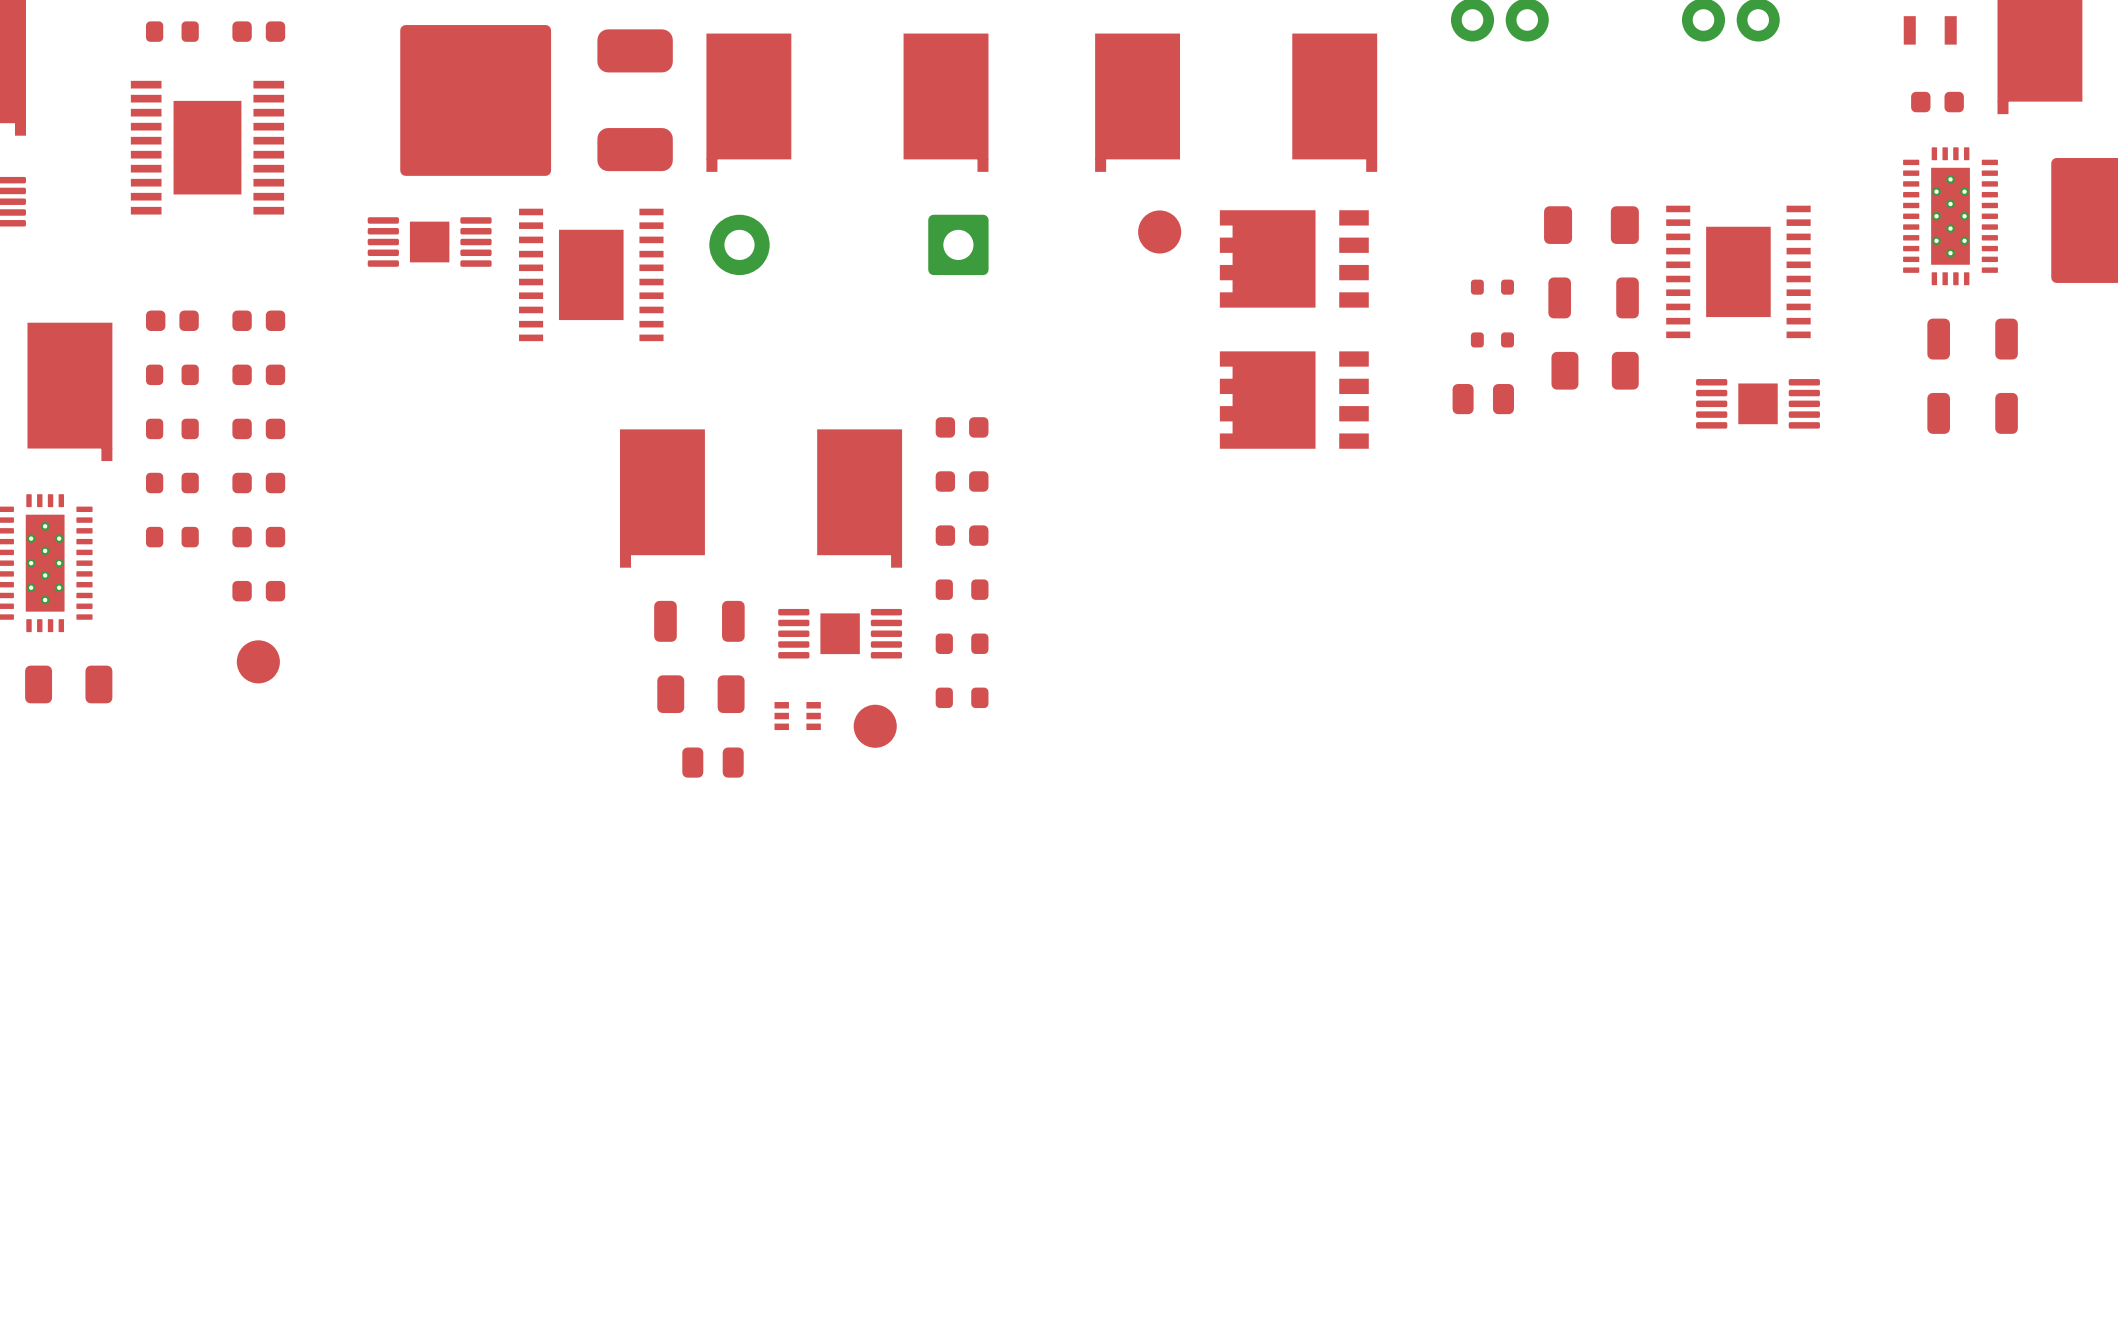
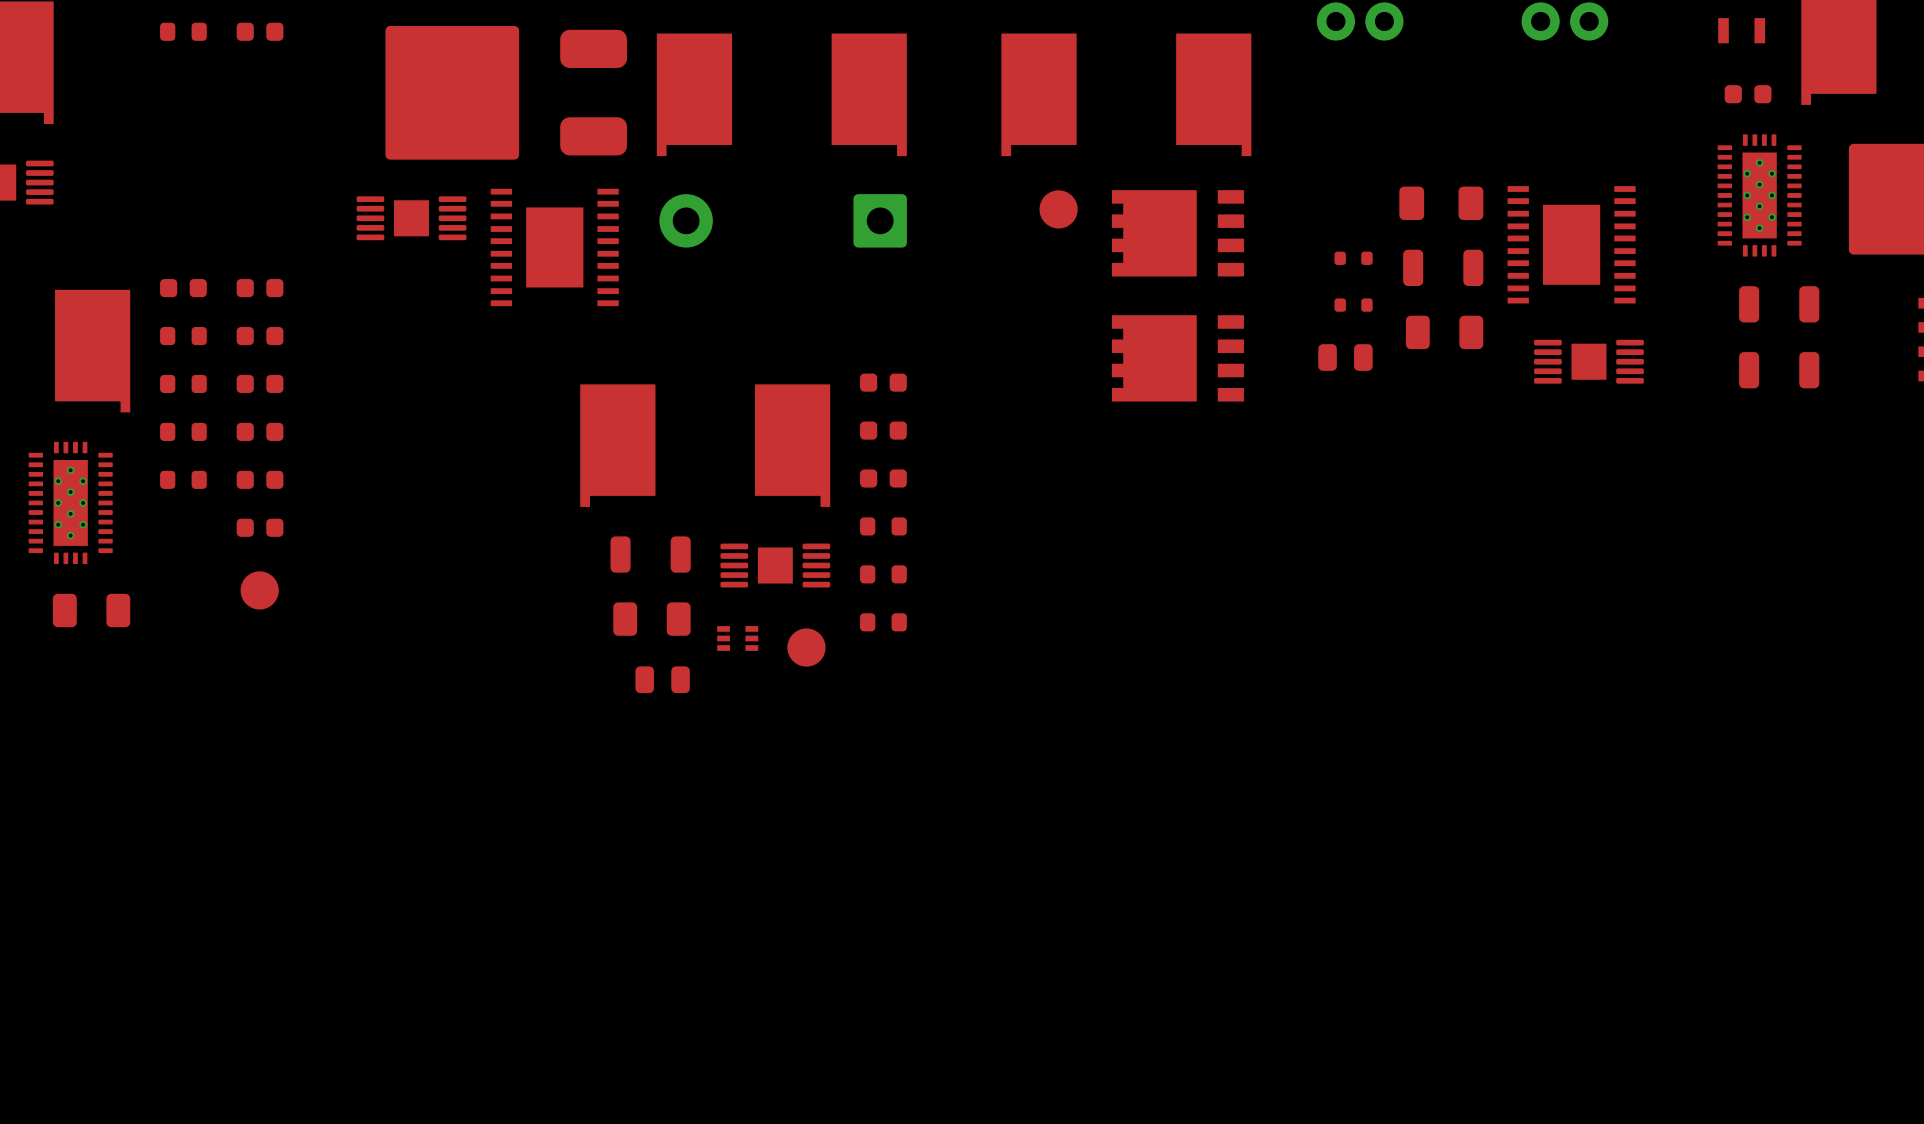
part: (207, 147) -> none

